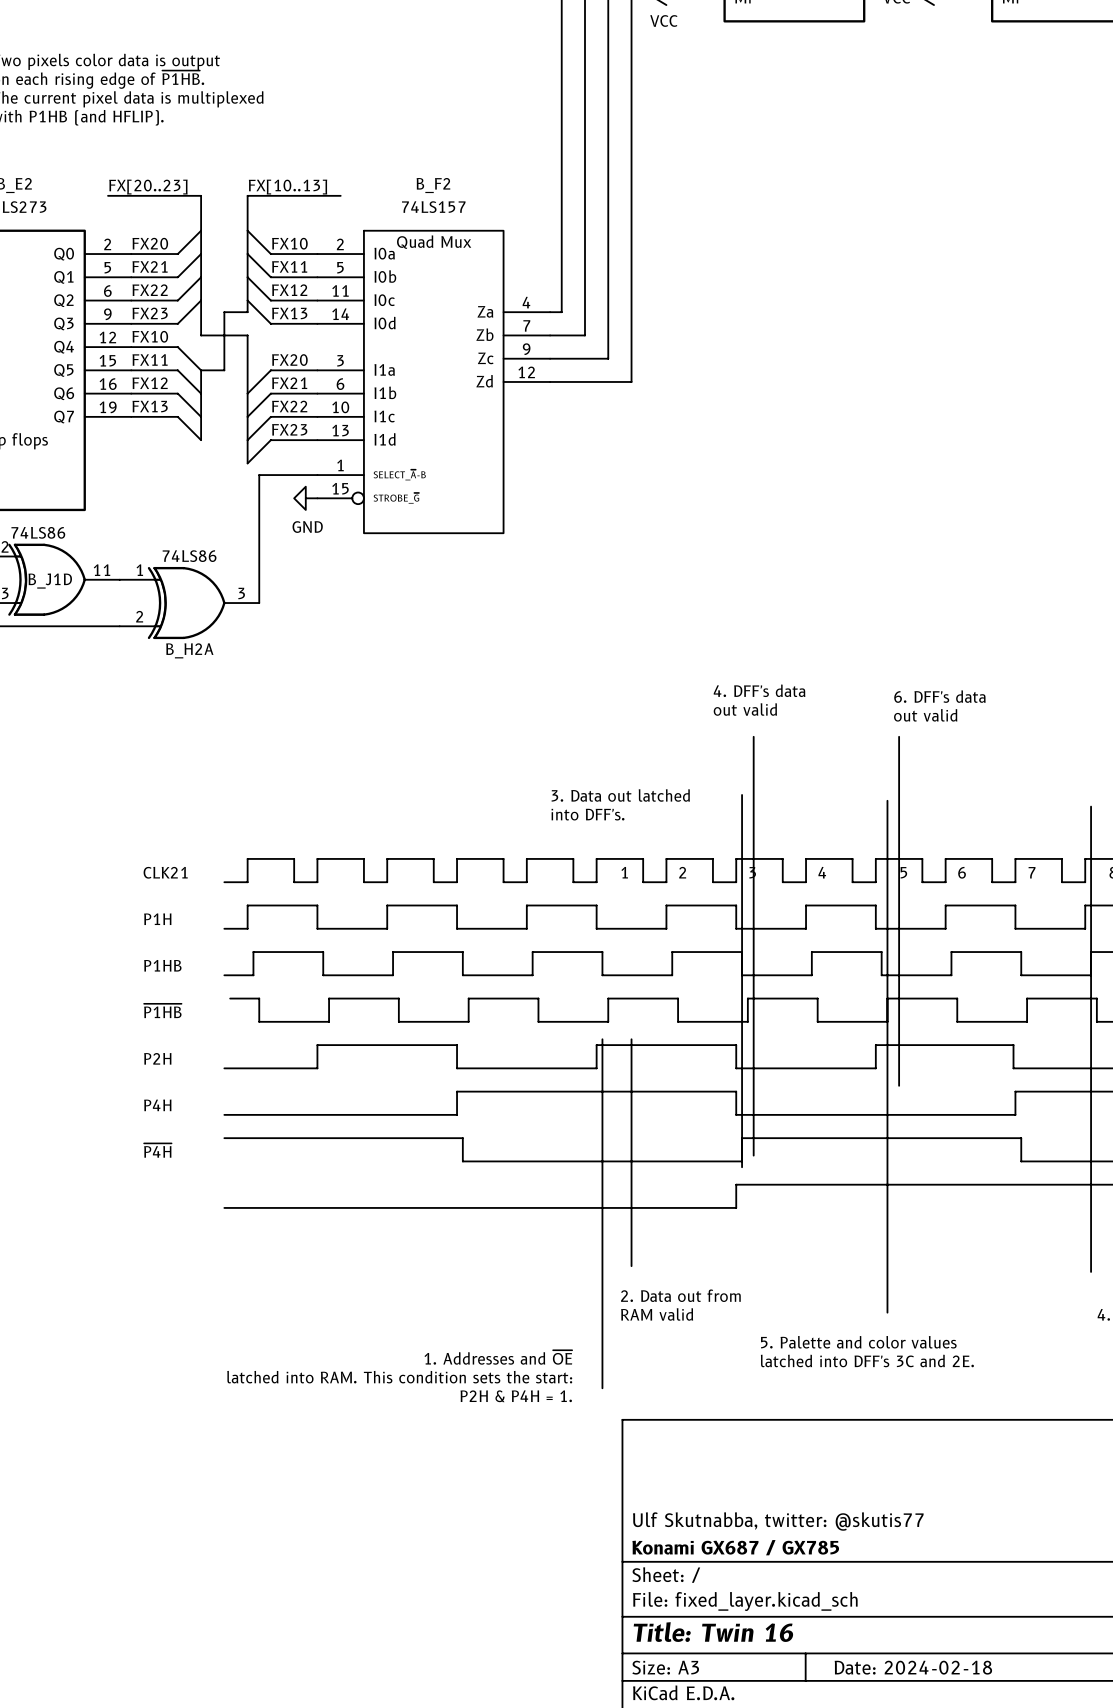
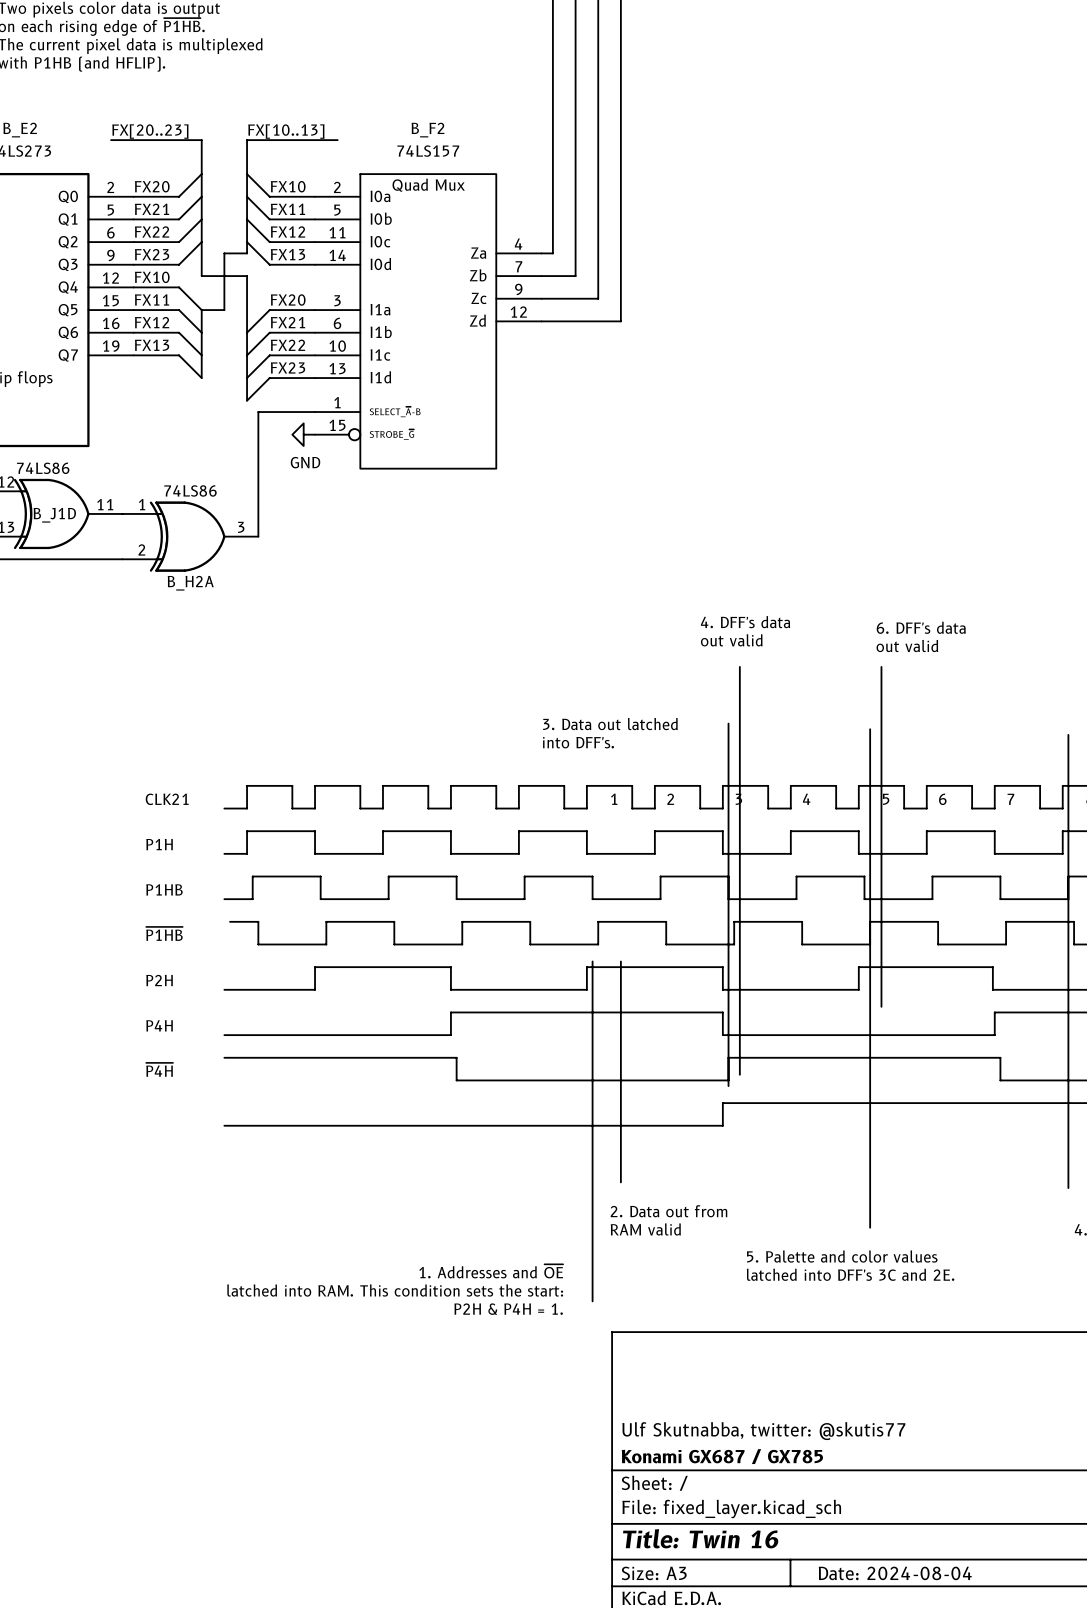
title block: Date: 2024-02-18 (913, 1667) -> Date: 2024-08-04 (895, 1573)

